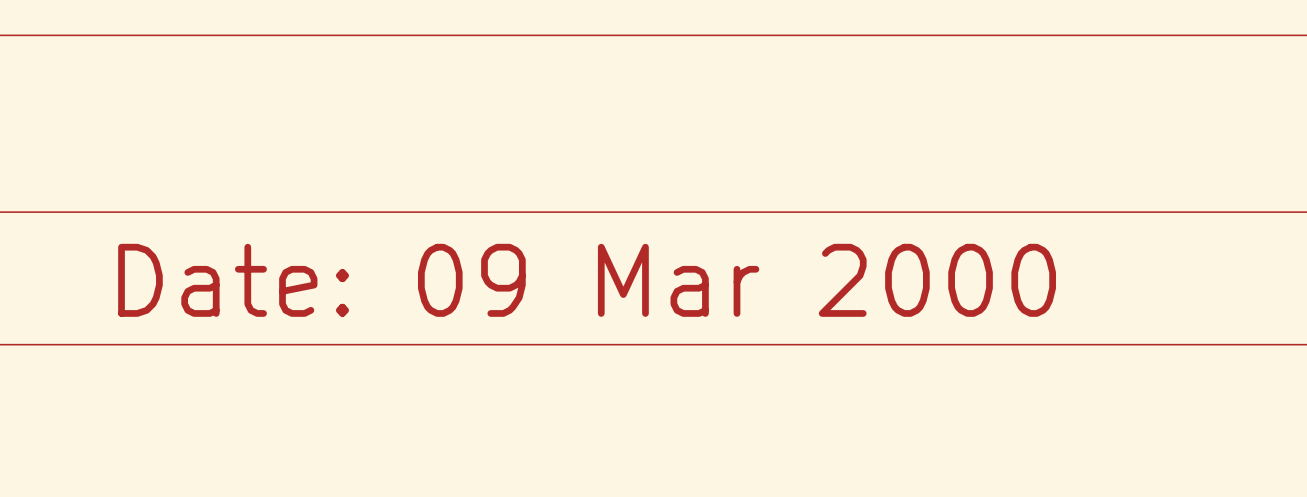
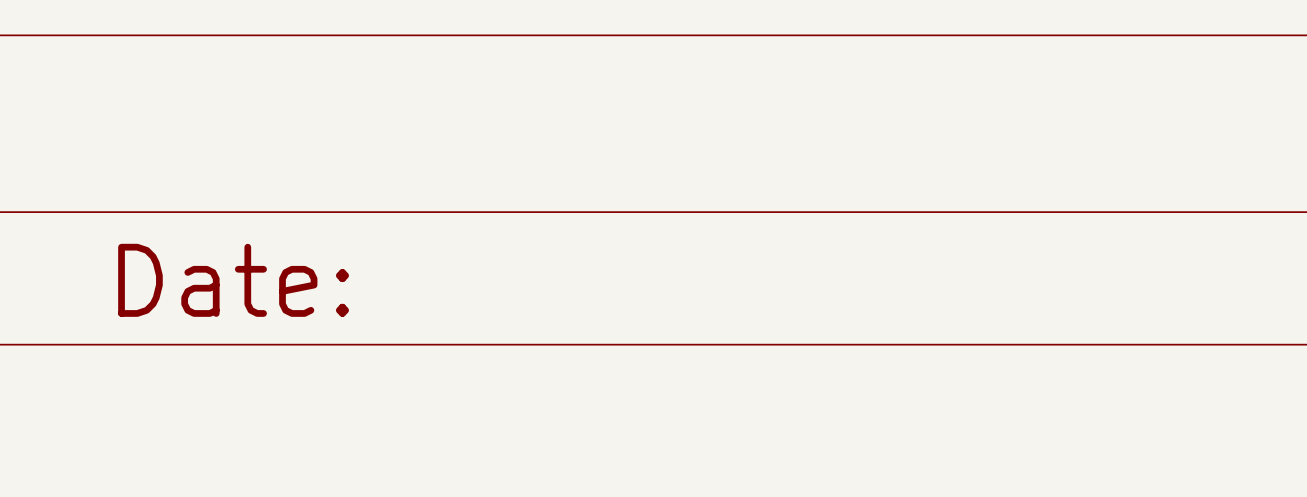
title block: Date: 09 Mar 2000 (587, 280) -> Date: (233, 280)

